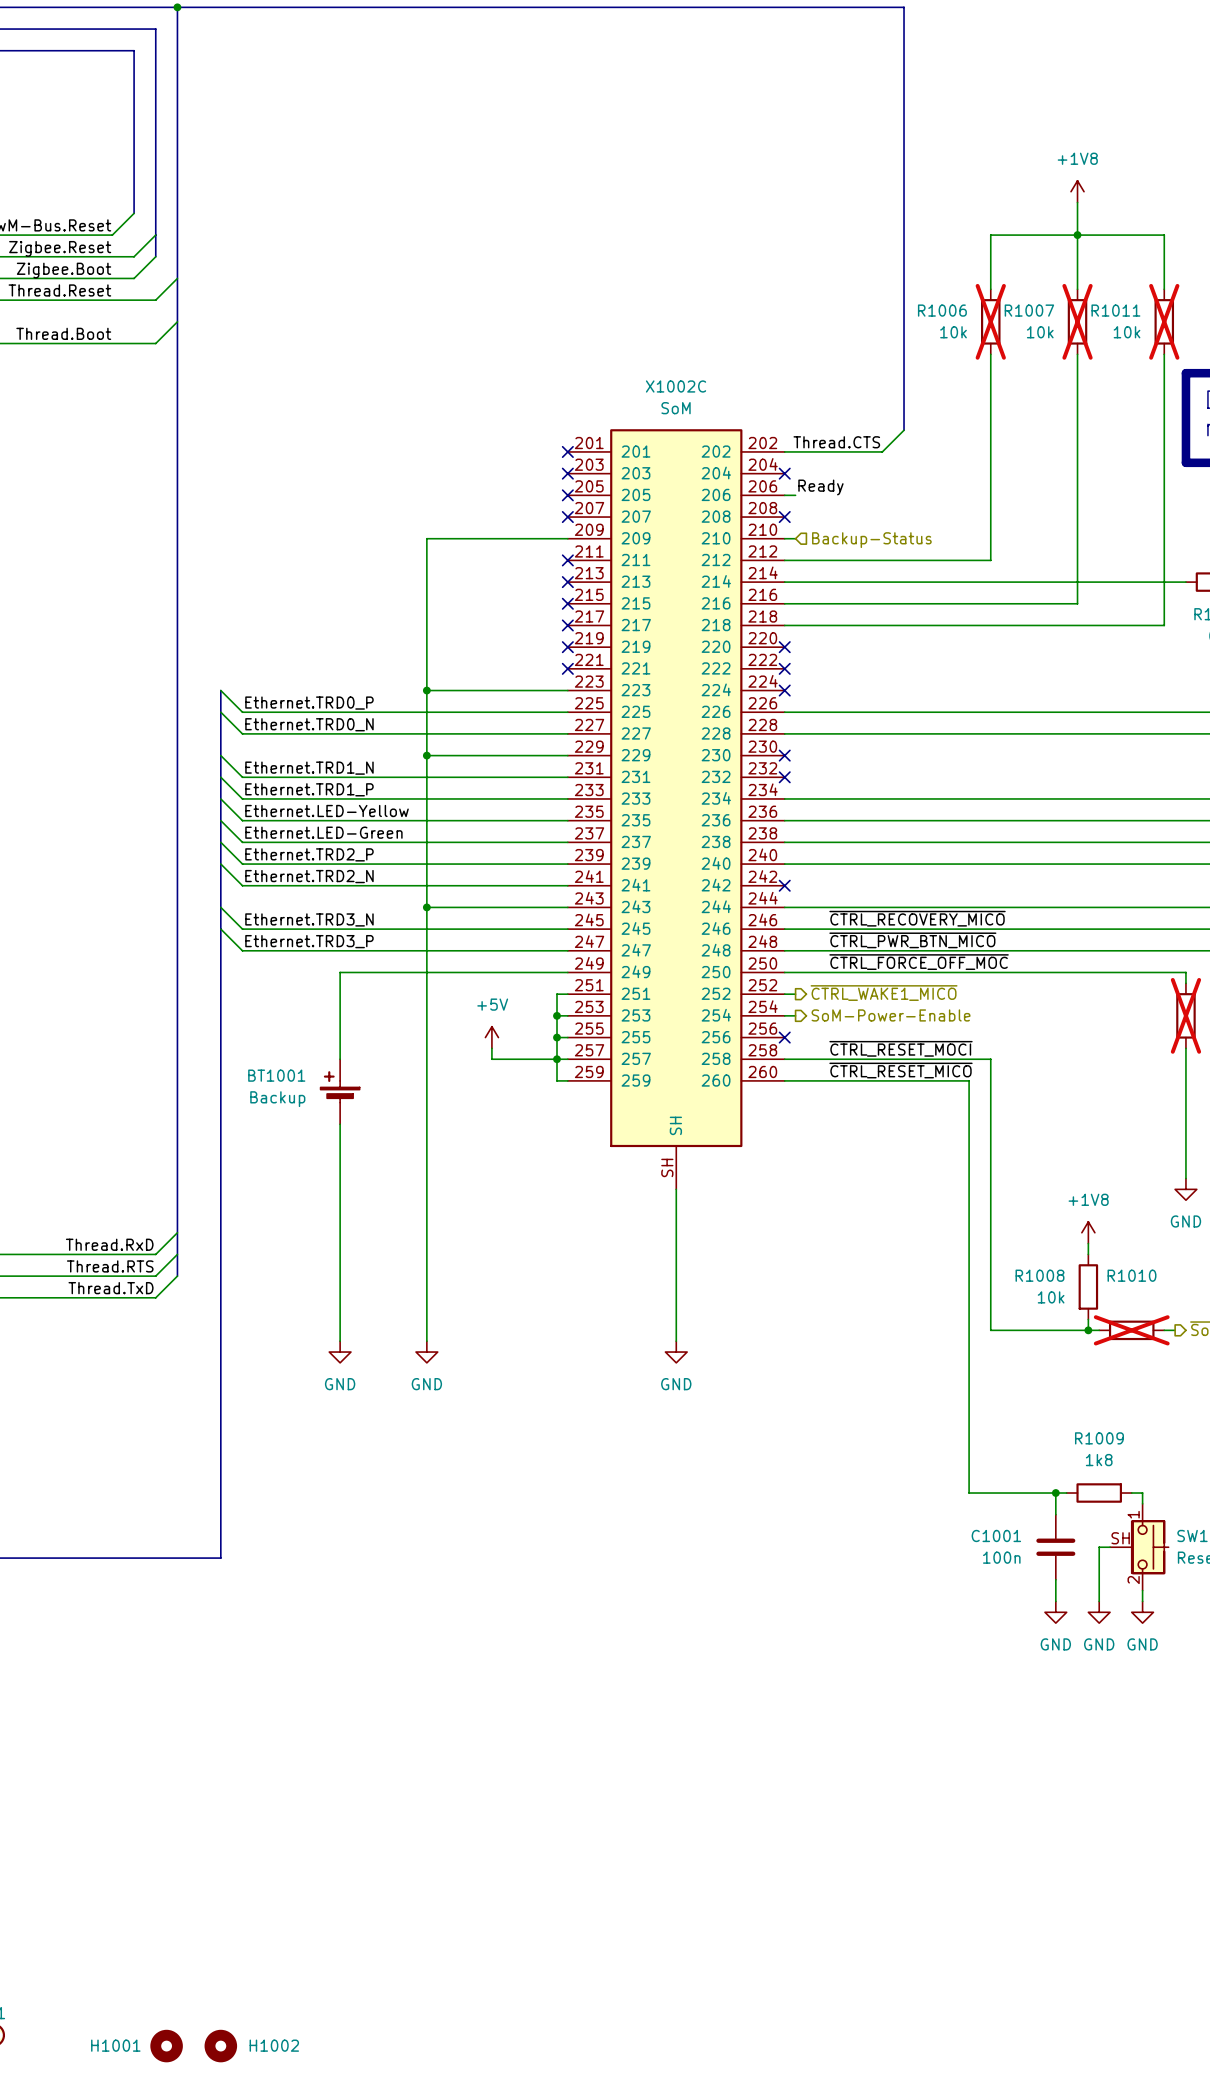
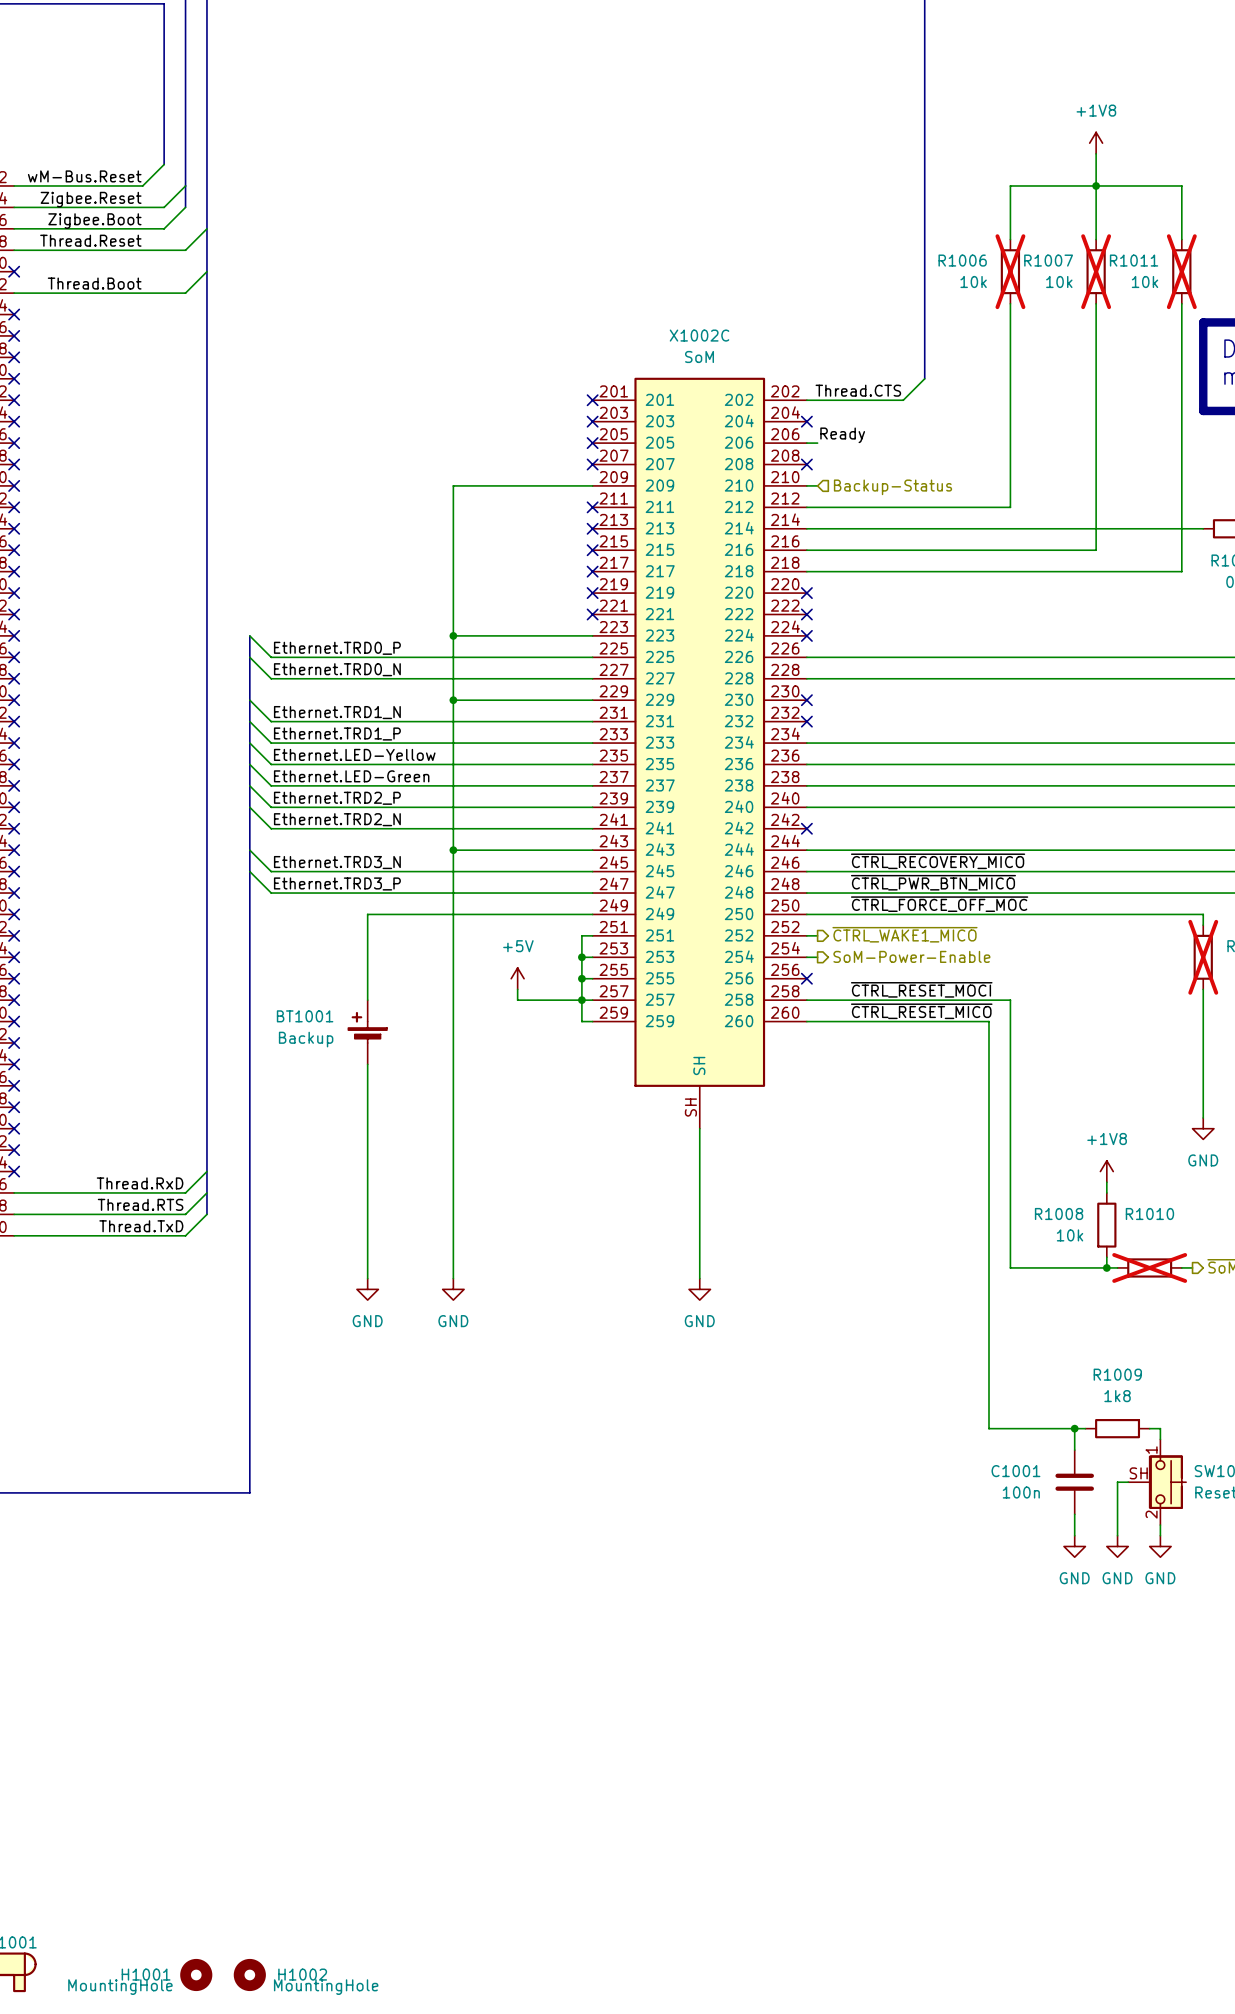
H1001 value: none -> MountingHole (120, 1987)
H1002 value: none -> MountingHole (326, 1987)

